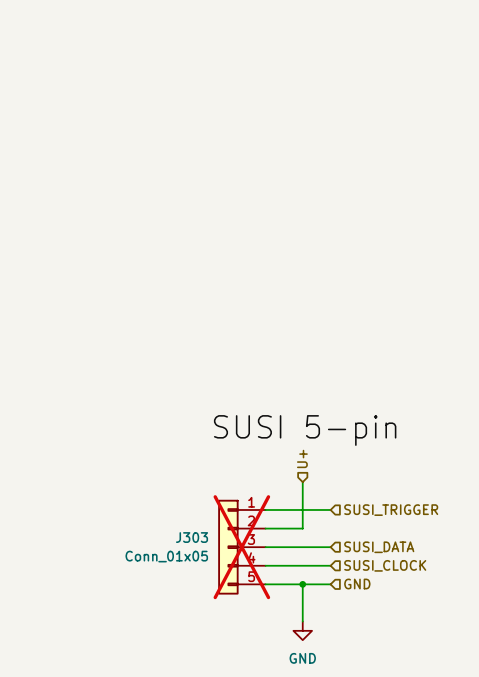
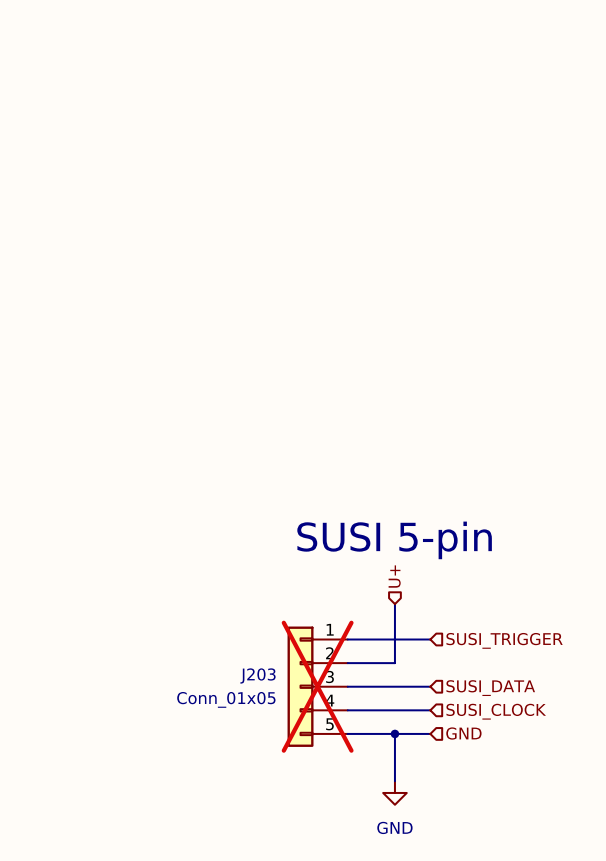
label: SUSI 5-pin (305, 430) -> none
text: none -> SUSI 5-pin (394, 540)
J303 name: J303 (192, 537) -> J203 (258, 675)

